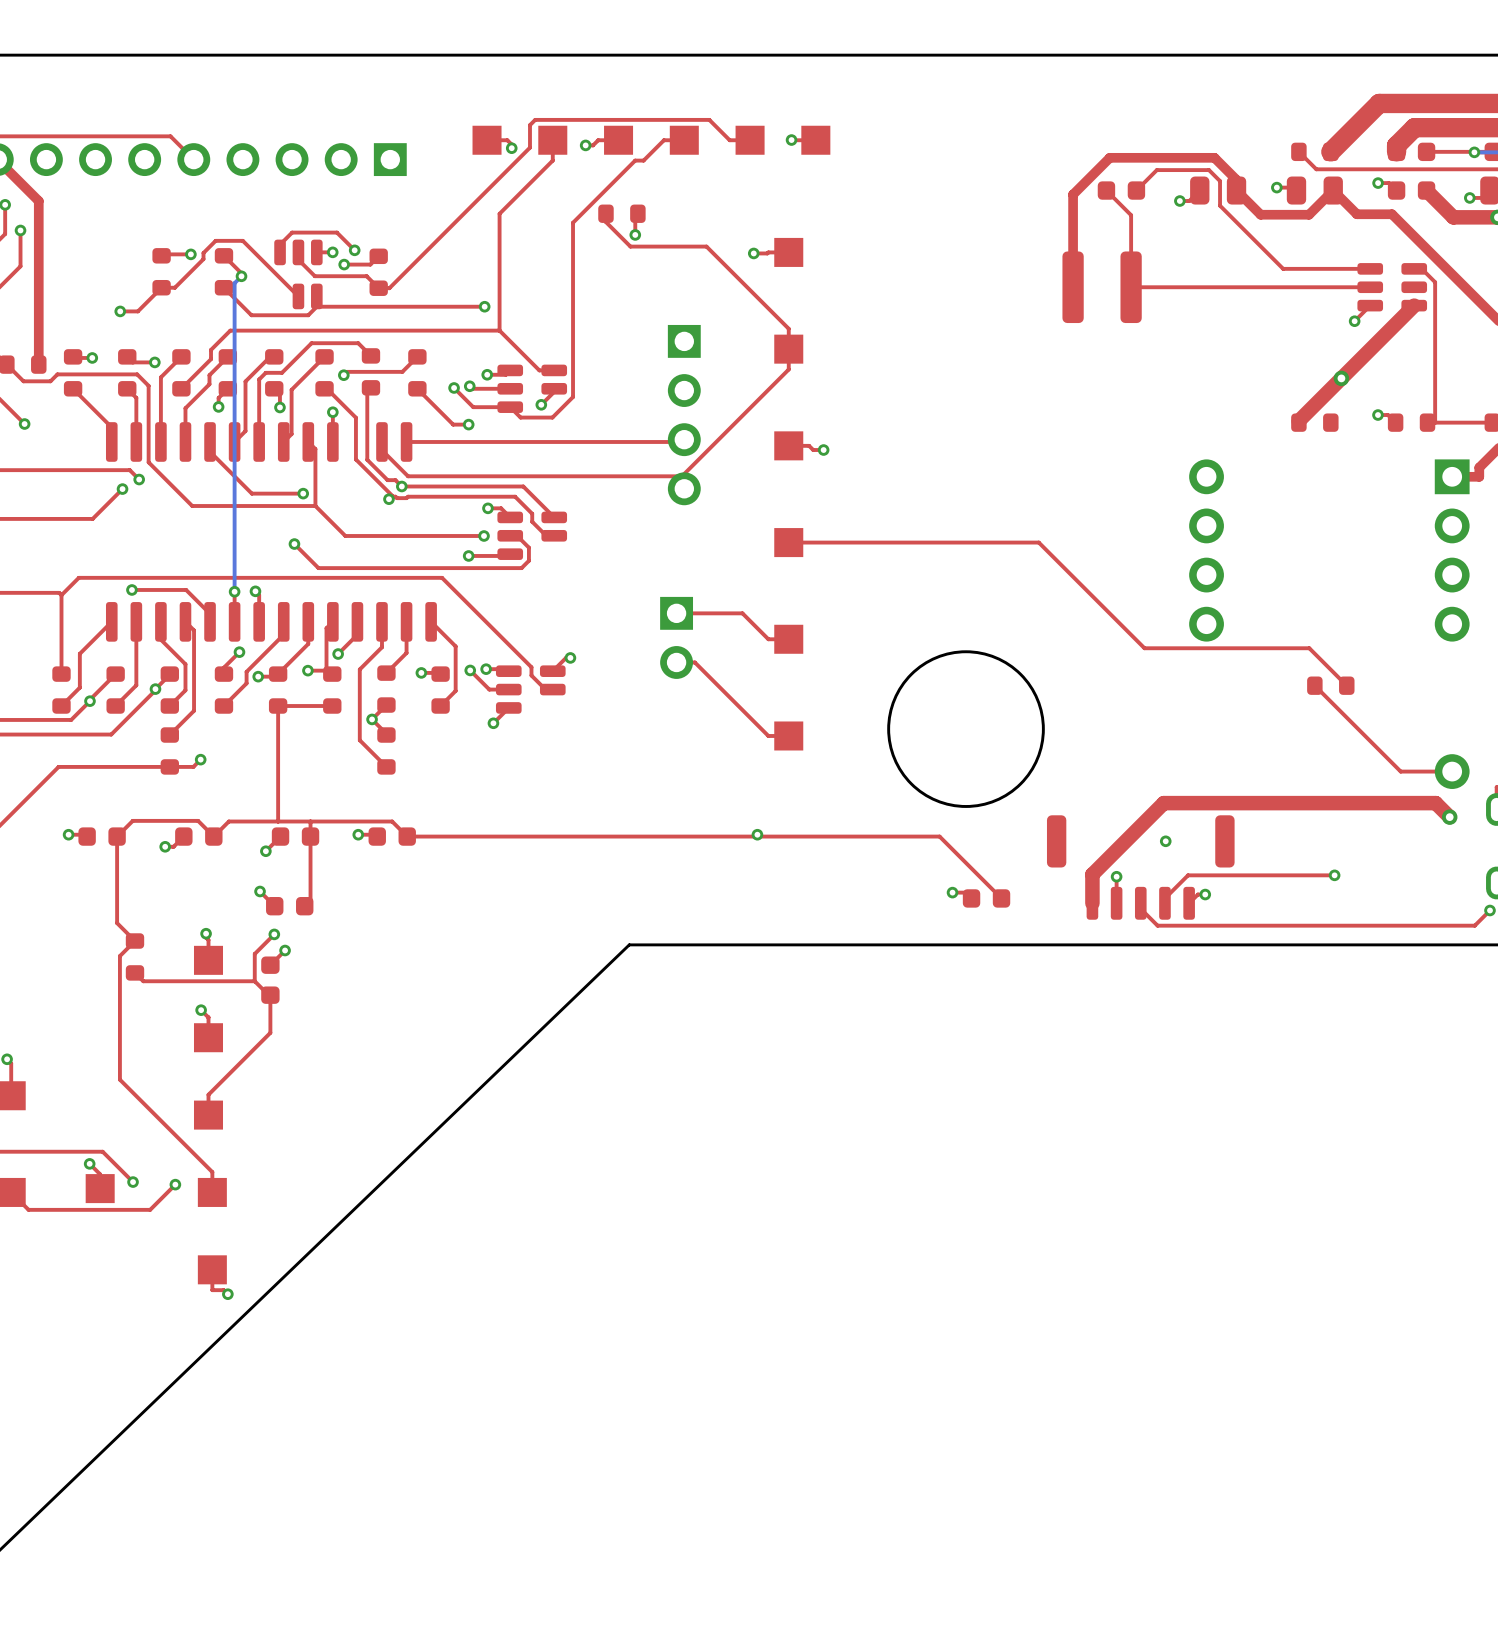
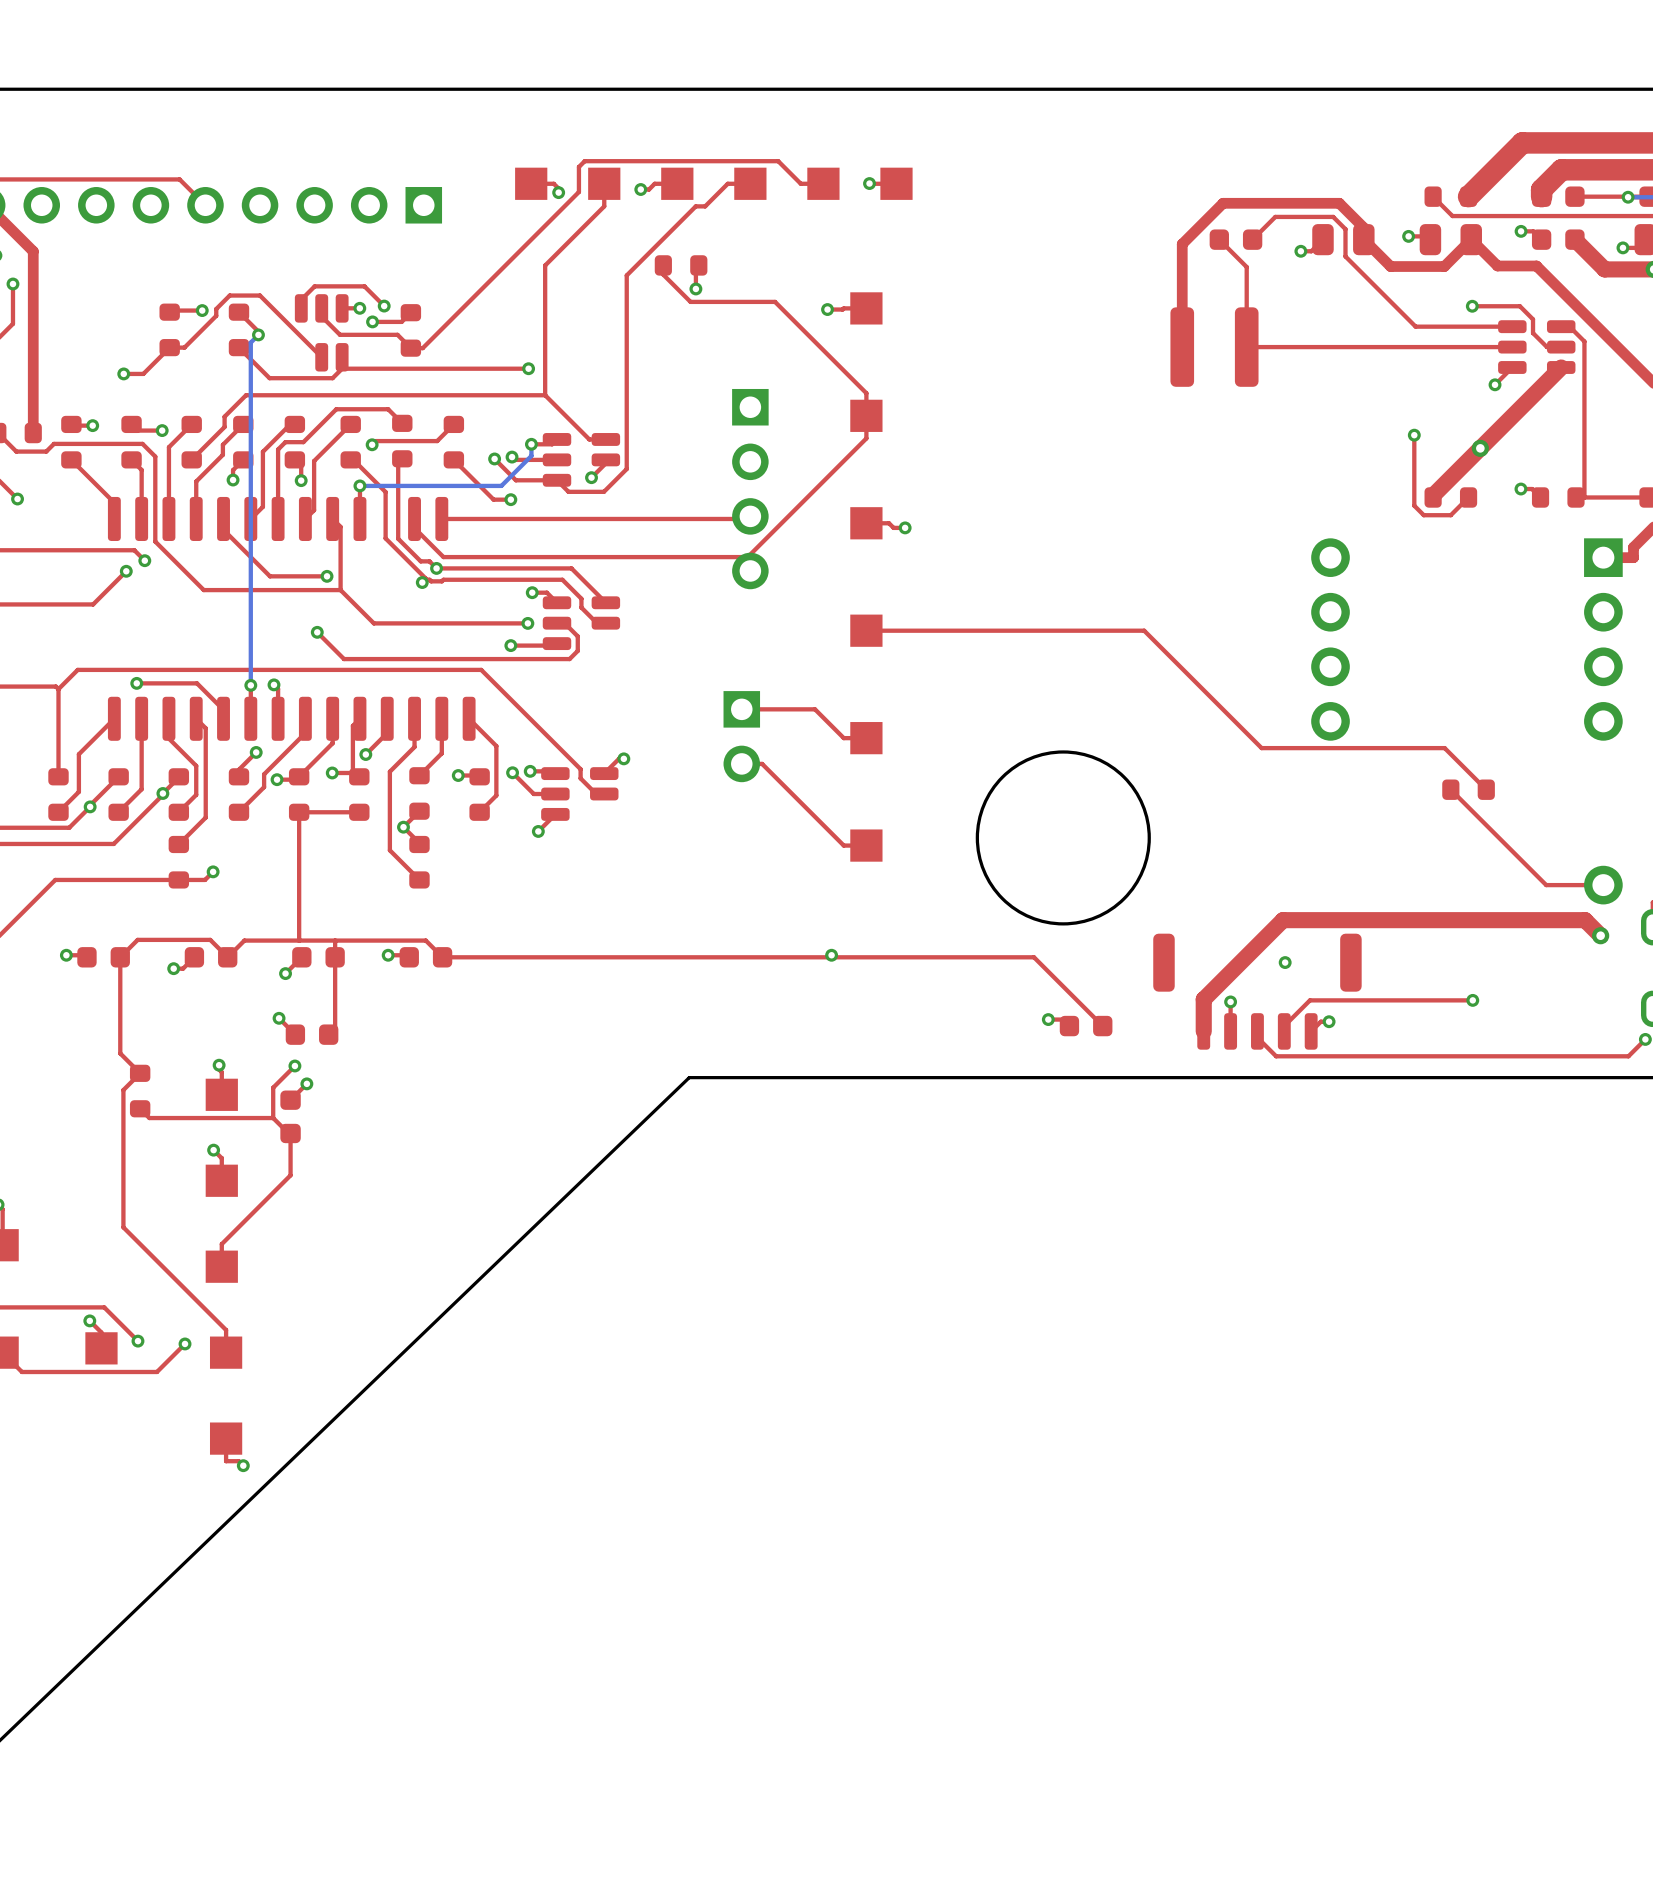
top track: none -> (1472, 306) (1519, 306) (1533, 319) (1533, 333) (1546, 347) (1561, 347)
via: none -> (1472, 306)
top track: none -> (1414, 435) (1414, 505) (1423, 515) (1450, 515) (1468, 497)
via: none -> (1414, 435)
bottom track: none -> (531, 444) (531, 455) (501, 485) (359, 485)

